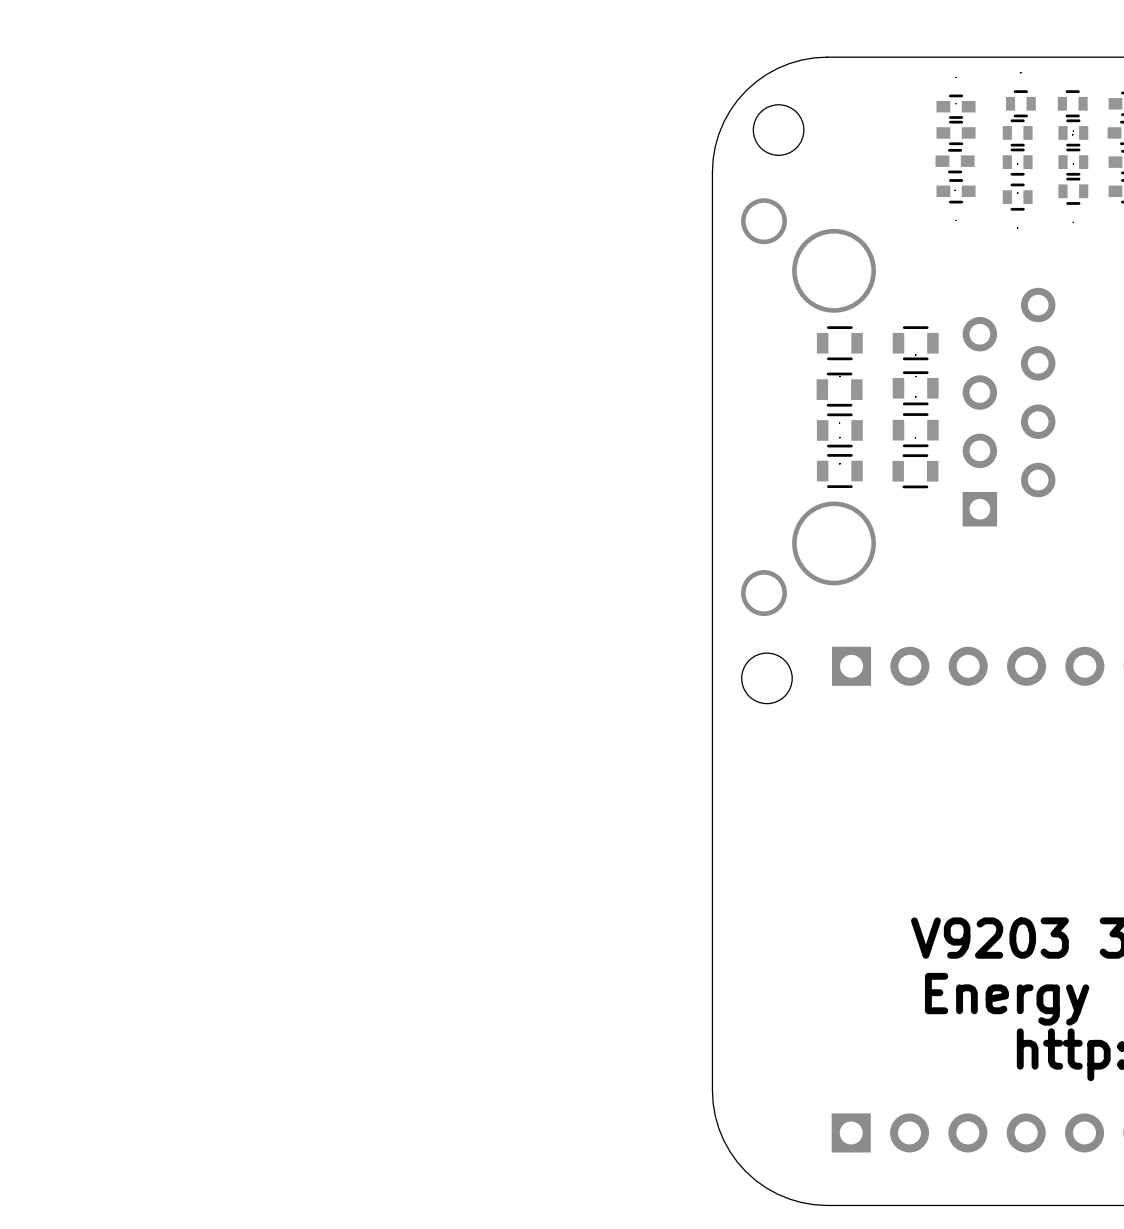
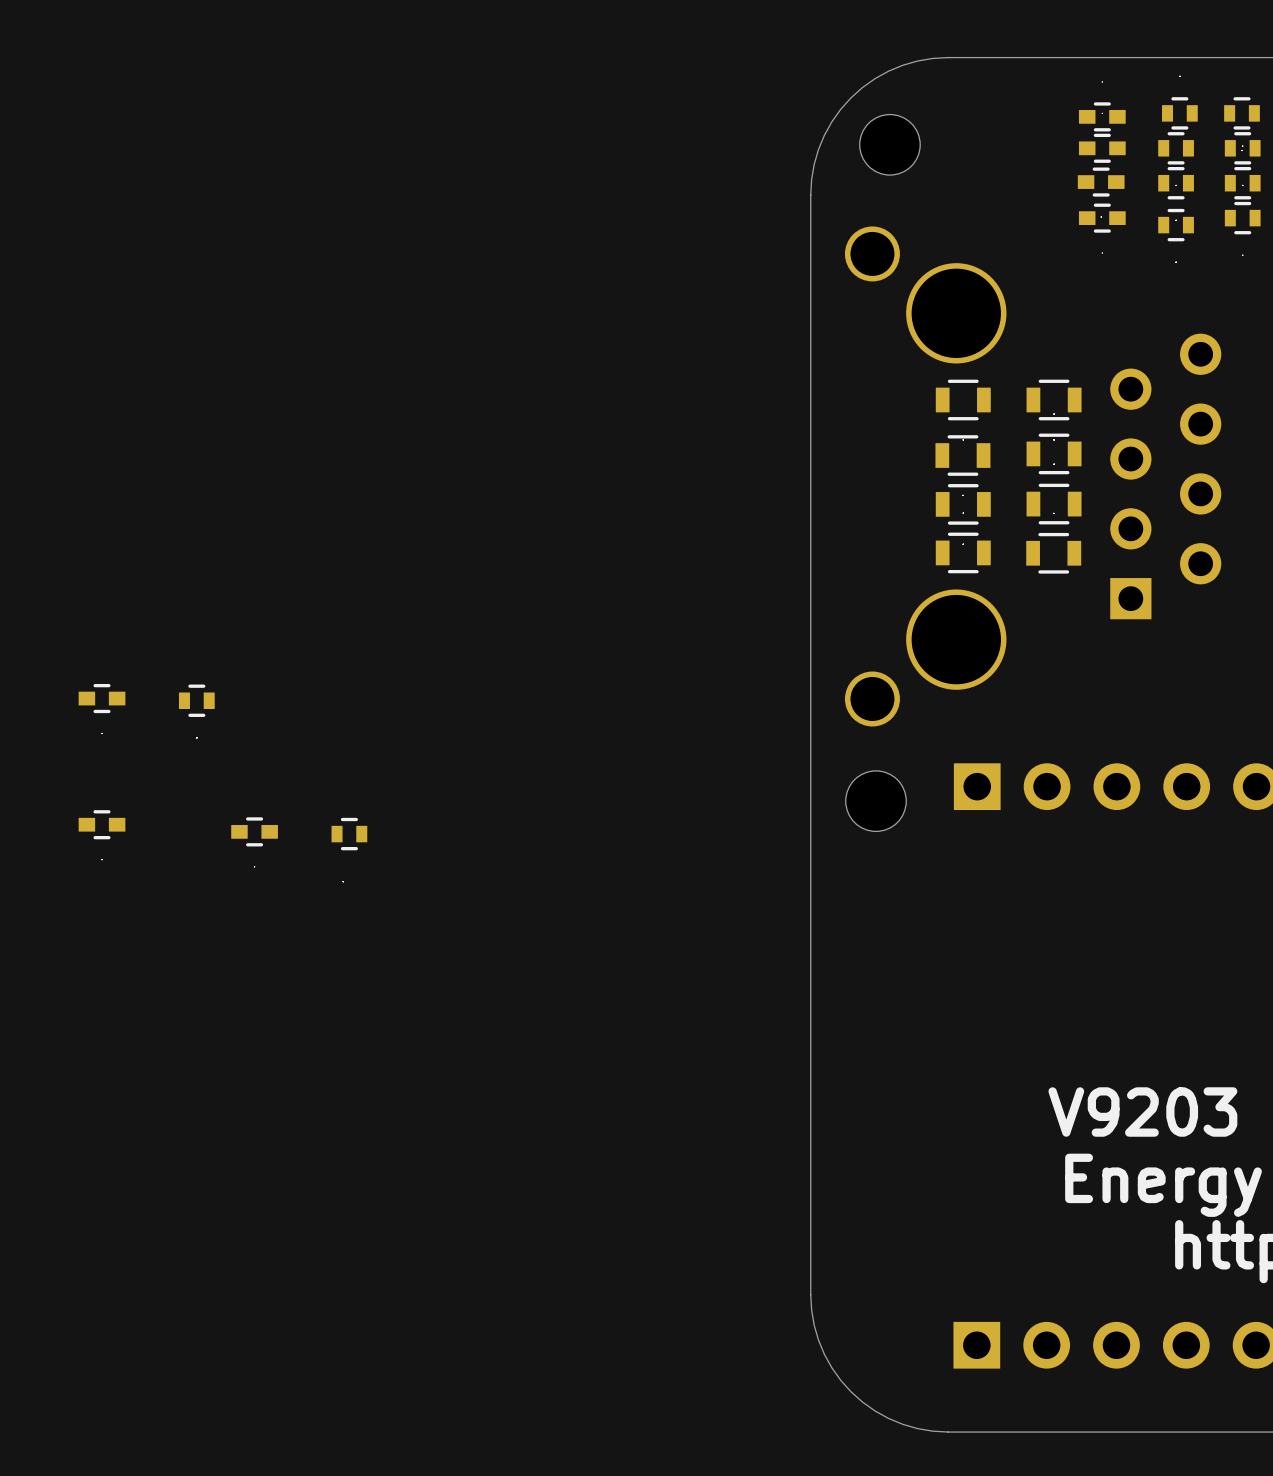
part: none -> (102, 698)
part: none -> (196, 700)
part: none -> (102, 824)
part: none -> (254, 831)
part: none -> (349, 834)

